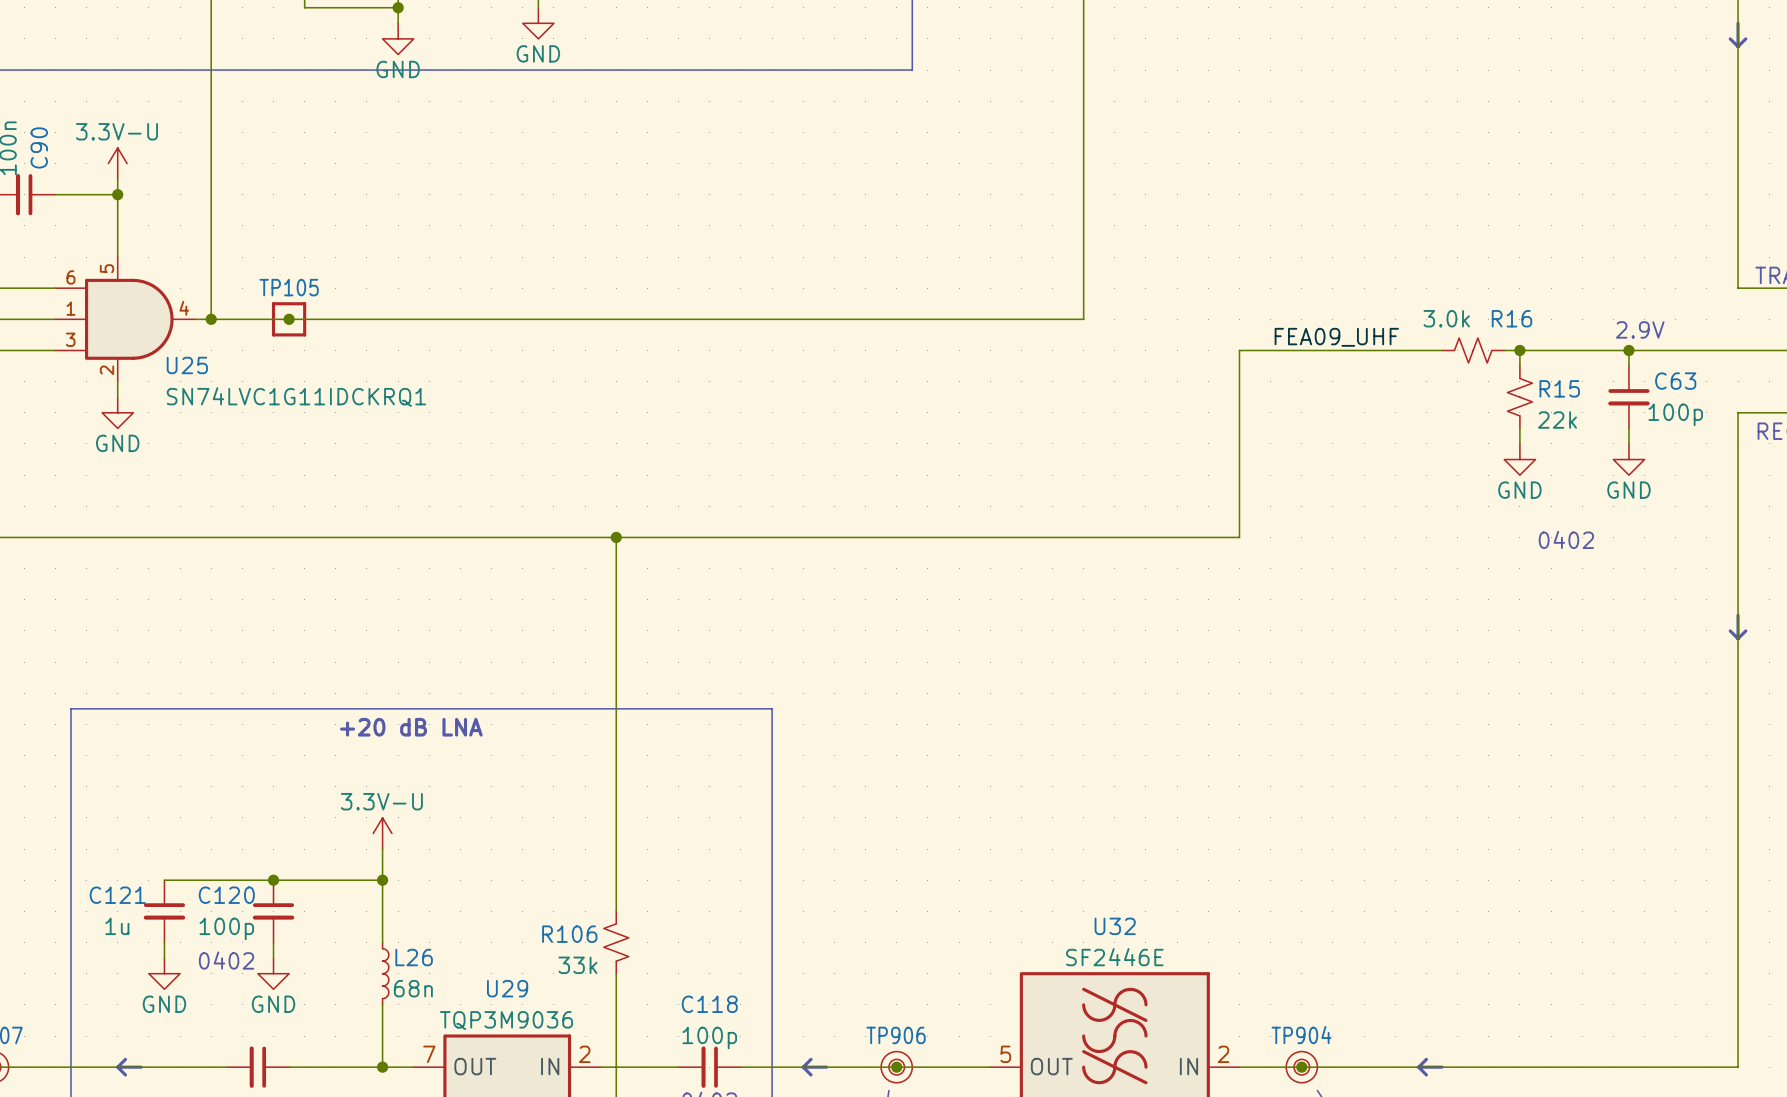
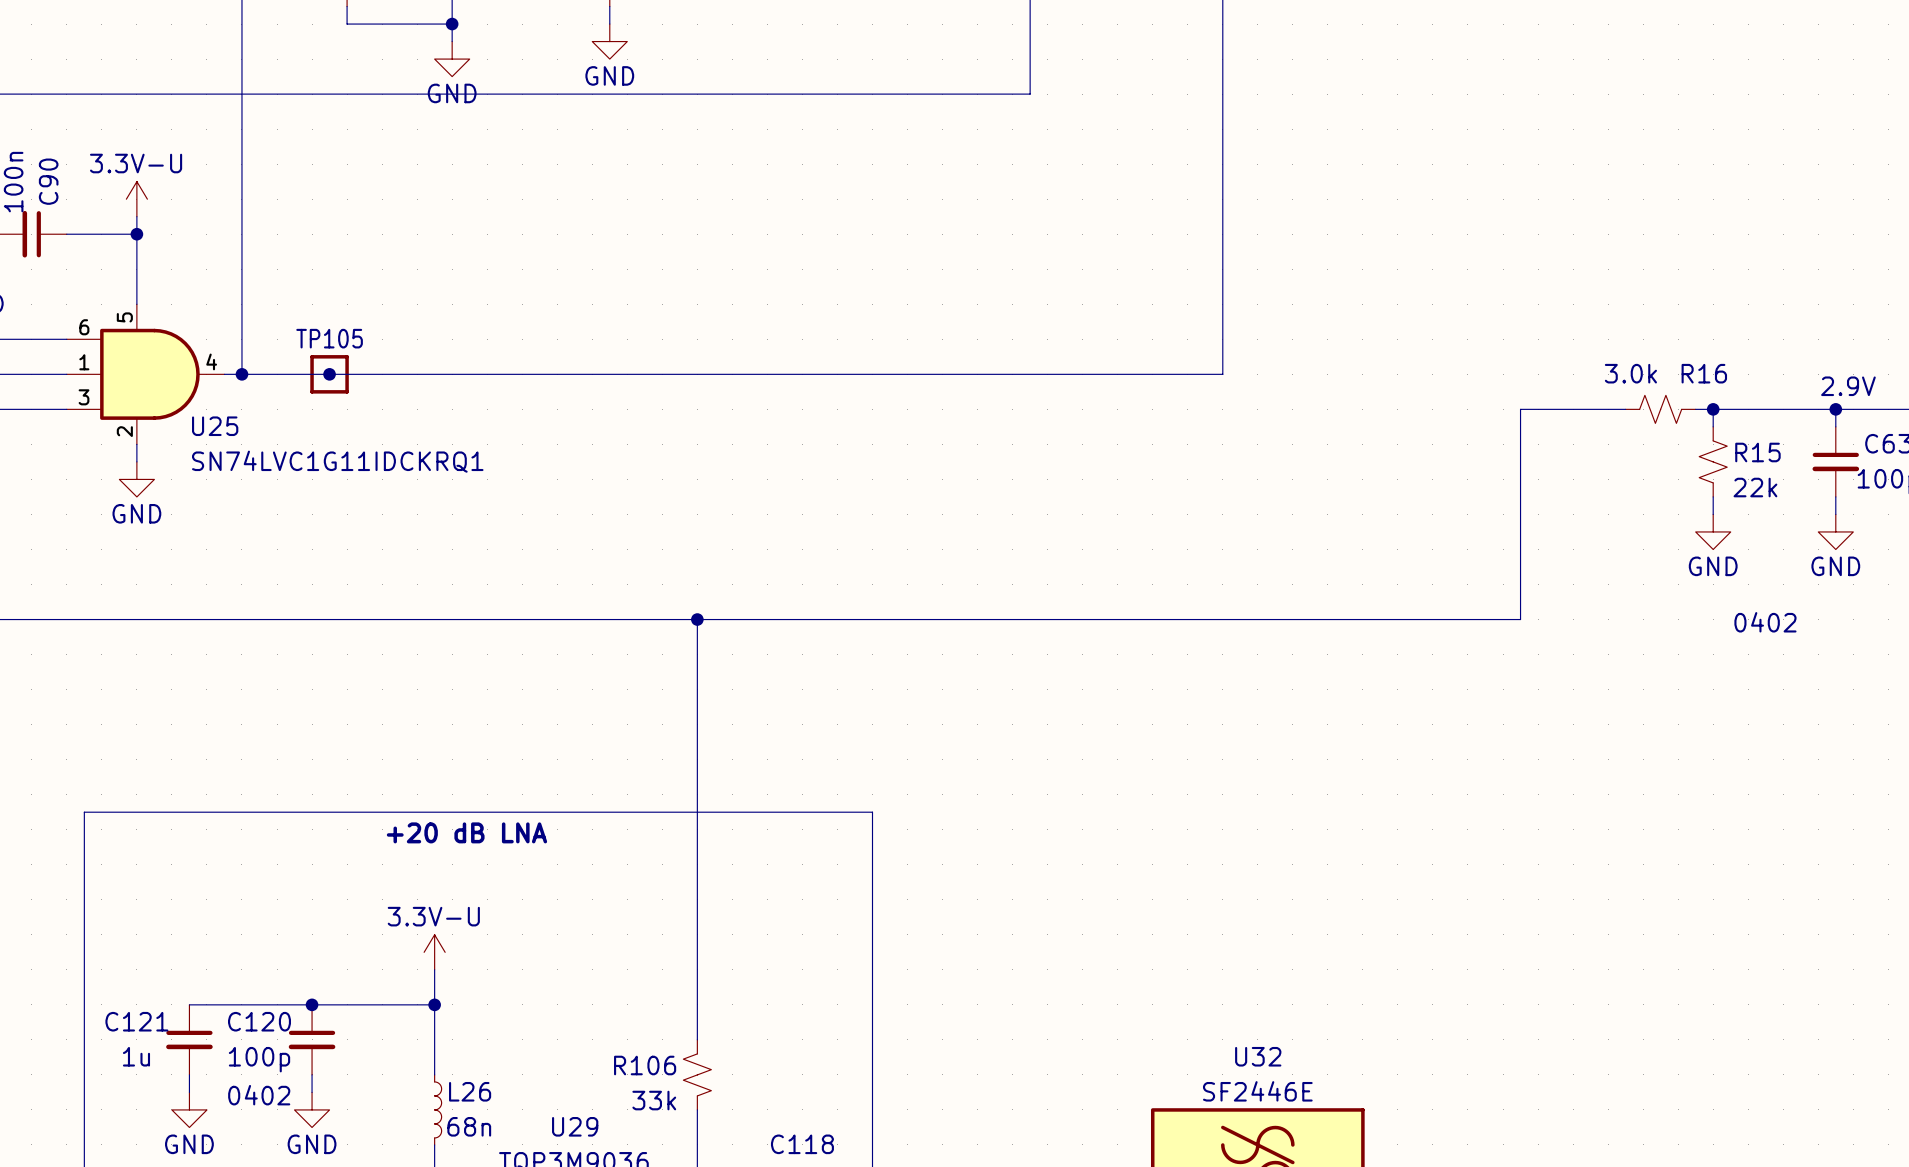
label: FEA09_UHF (1336, 337) -> none
wire: (1348, 350) (1239, 350) (1239, 537) -> (1520, 409) (1520, 619) (1397, 619)

